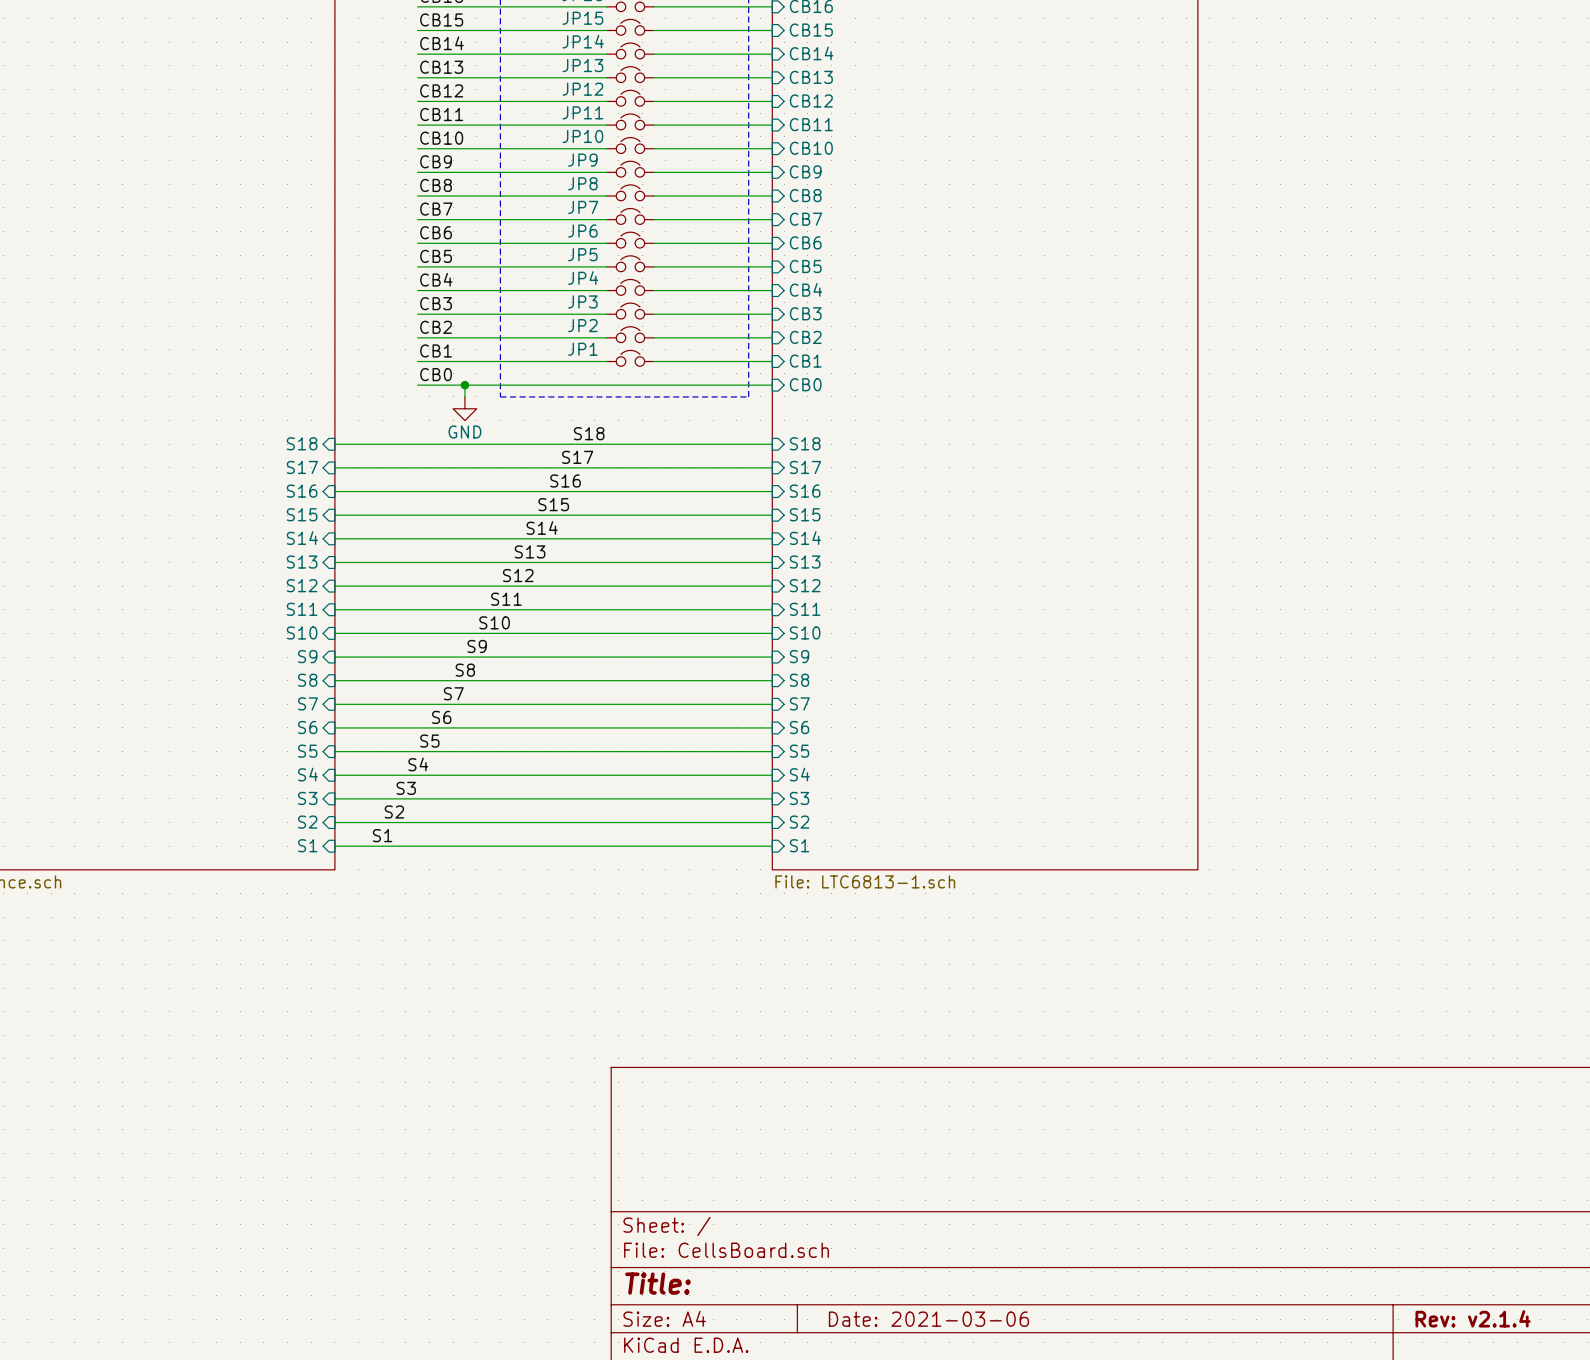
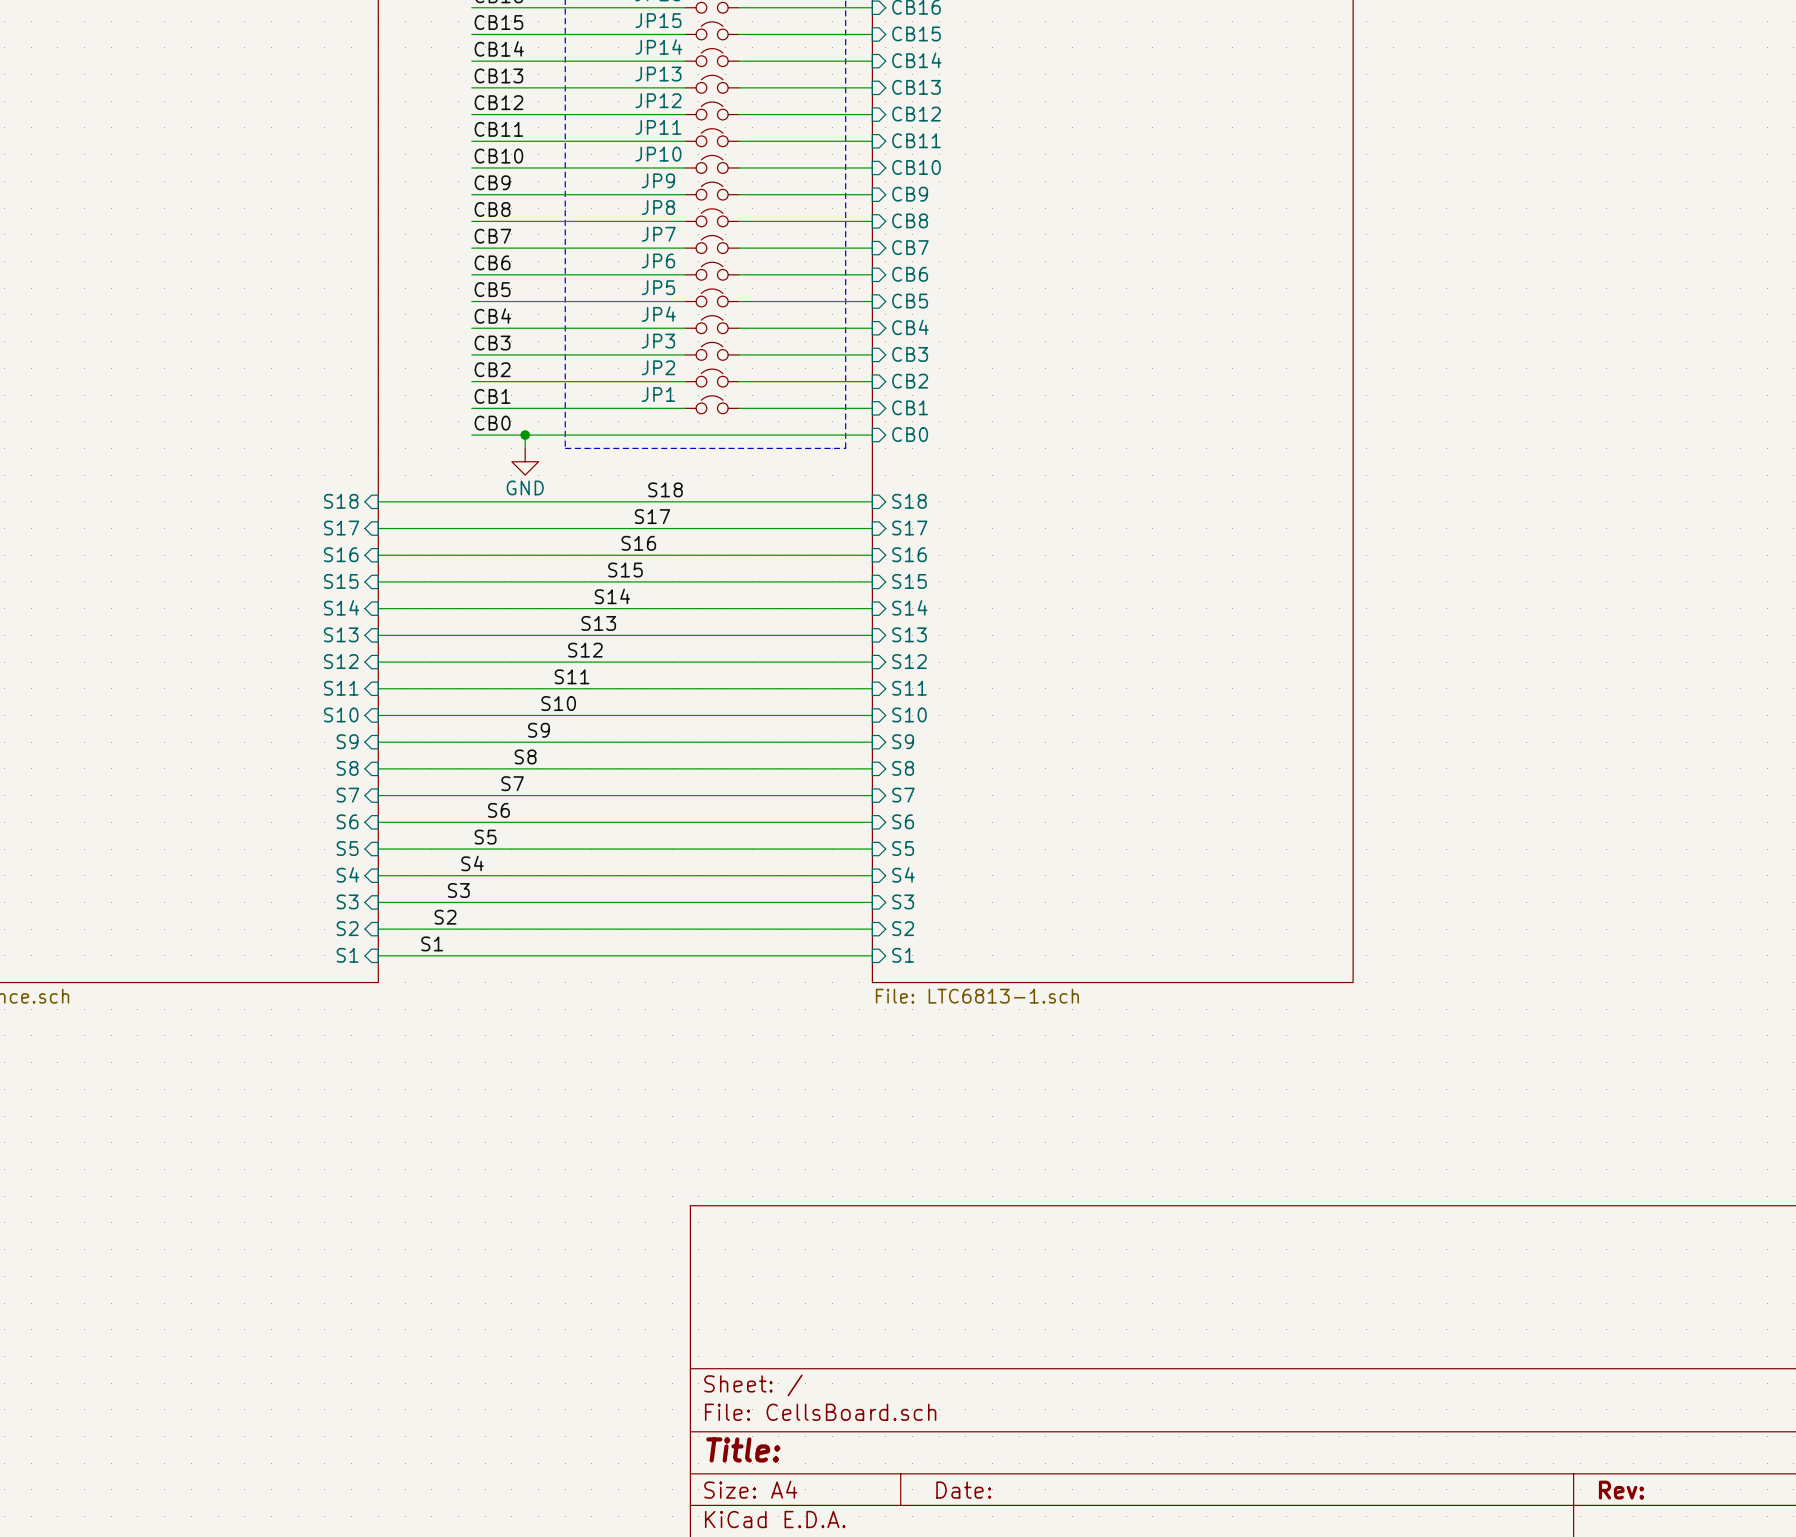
title block: Rev: v2.1.4 (1473, 1318) -> Rev: (1621, 1490)
title block: Date: 2021-03-06 (928, 1319) -> Date: (963, 1490)

